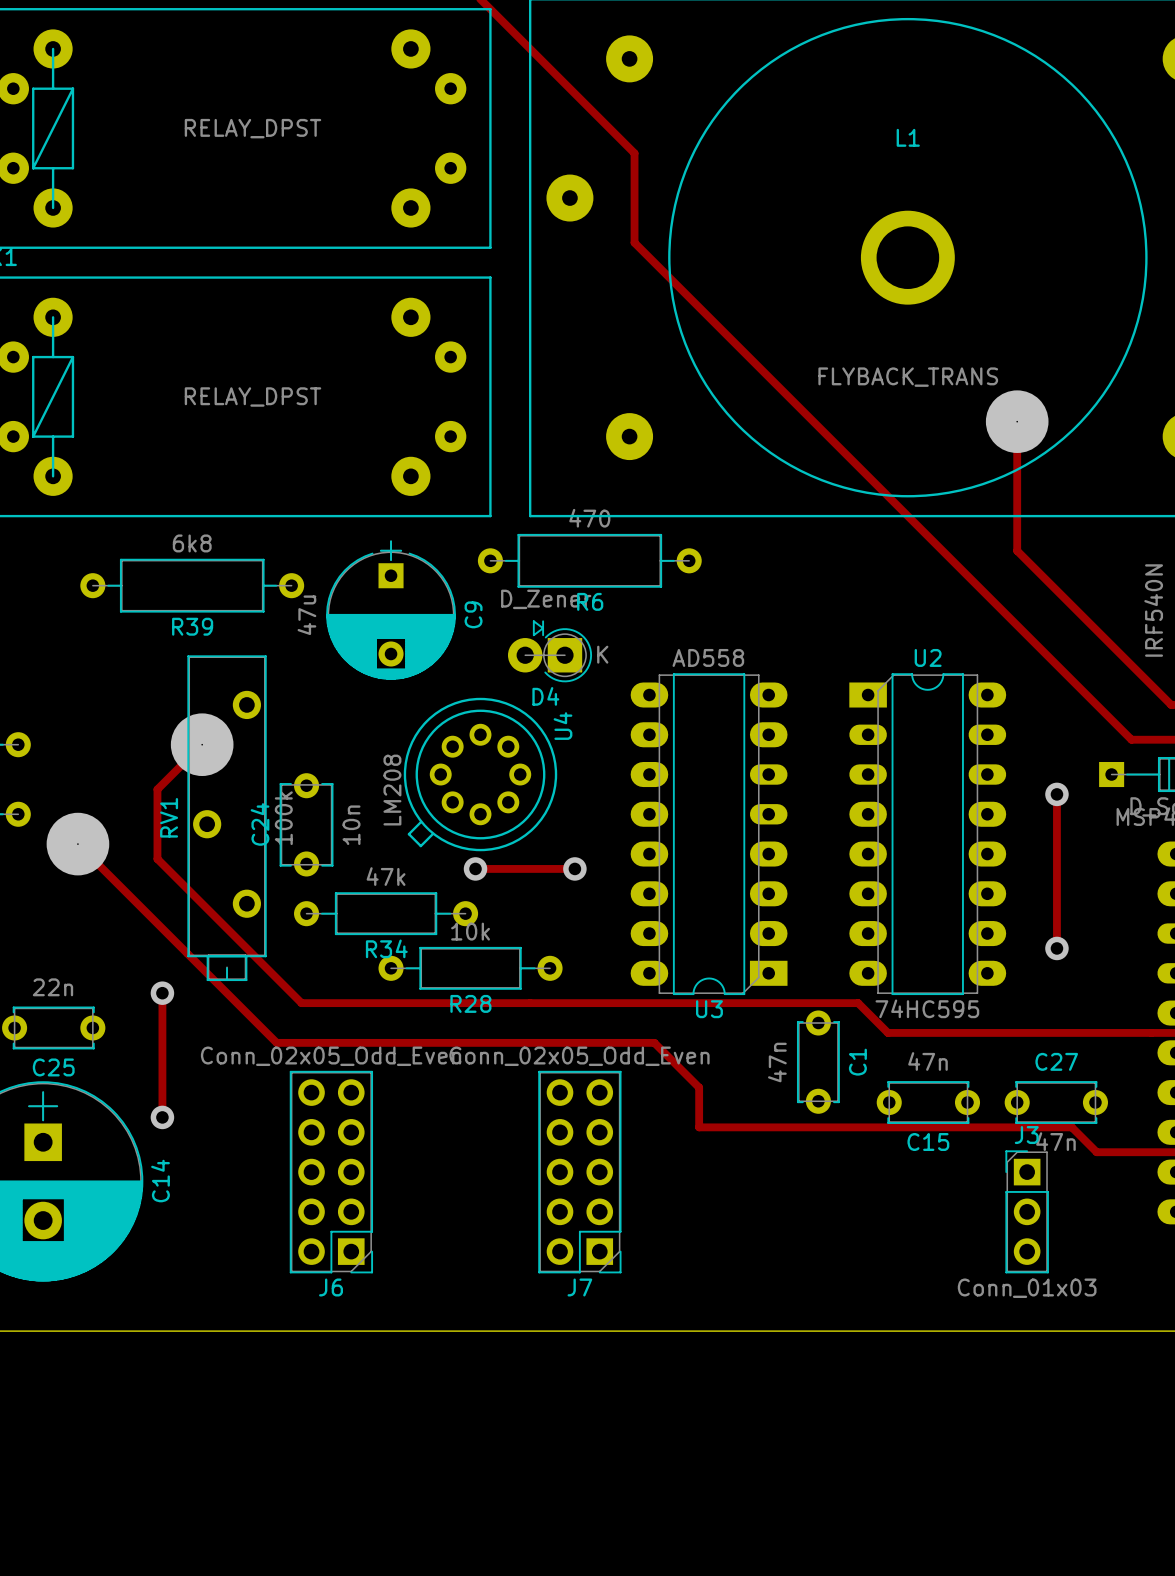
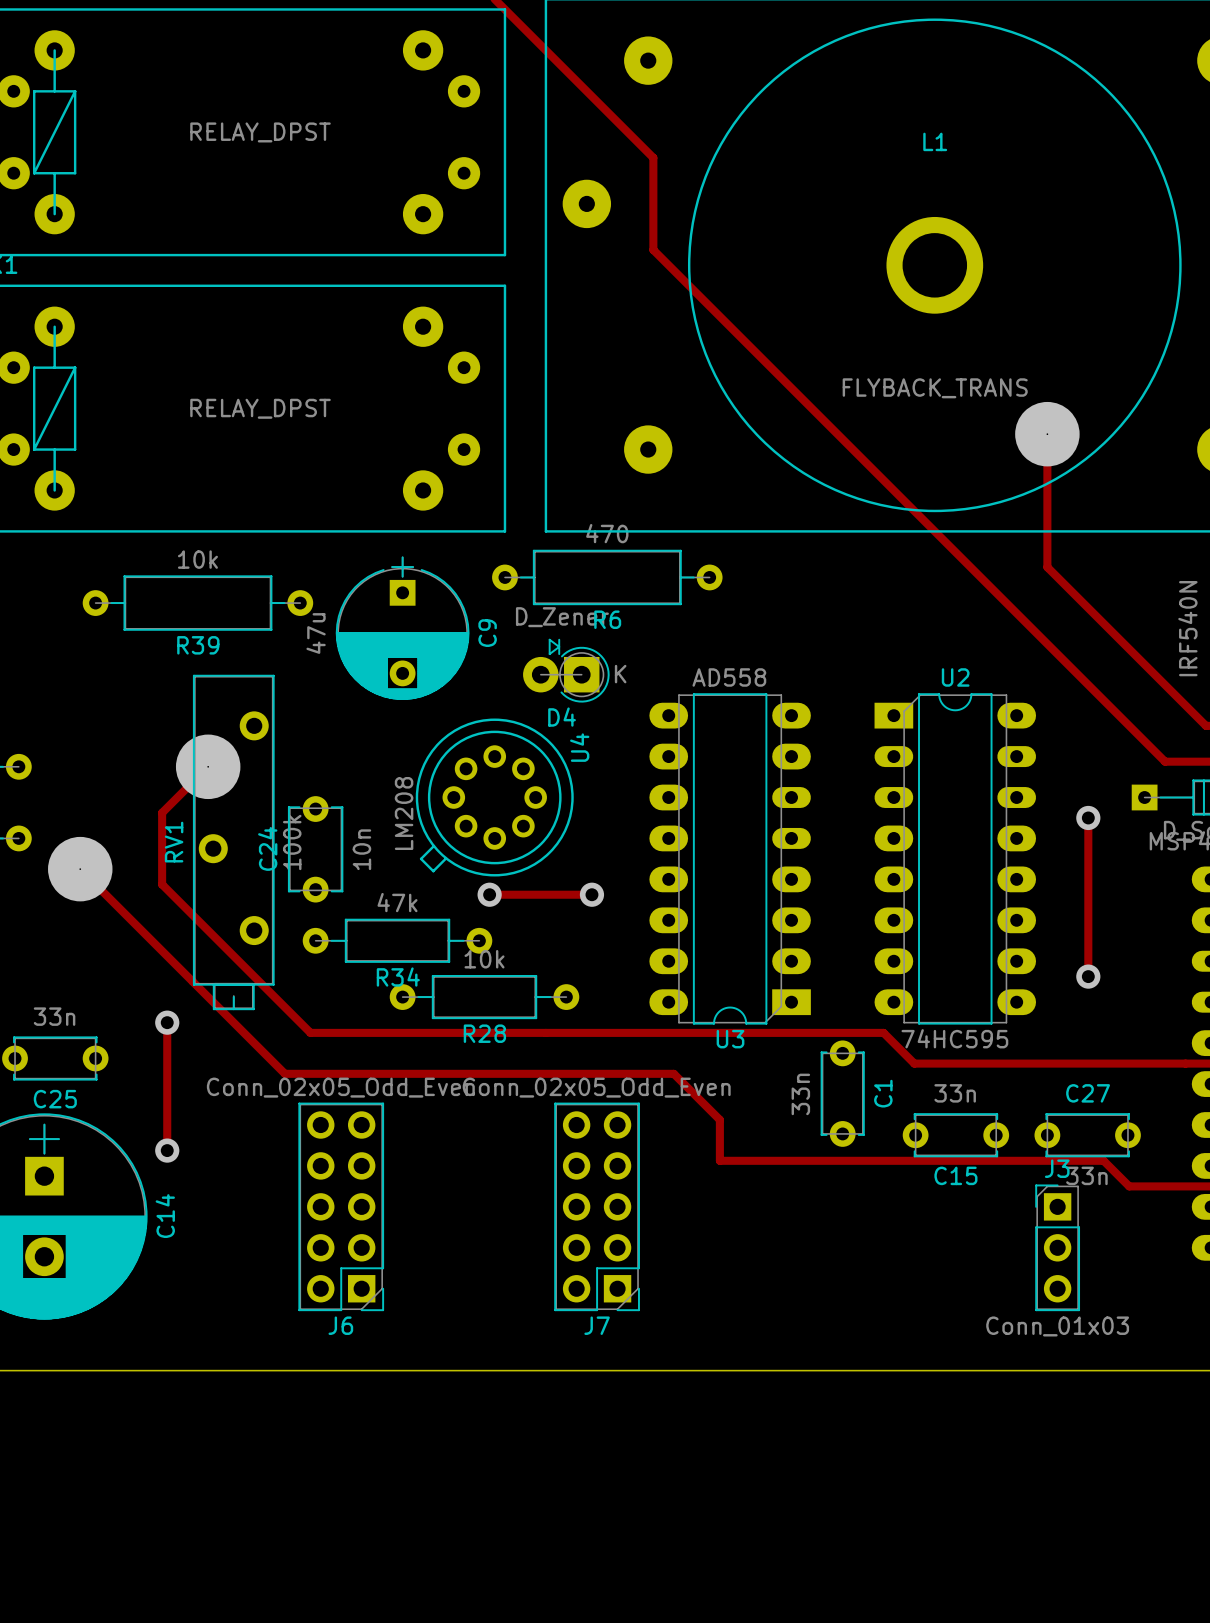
R39 value: 6k8 (192, 543) -> 10k (197, 559)
C25 value: 22n (52, 987) -> 33n (54, 1016)
C15 value: 47n (928, 1061) -> 33n (955, 1093)
C1 value: 47n (777, 1062) -> 33n (800, 1094)
C27 value: 47n (1055, 1141) -> 33n (1086, 1175)

